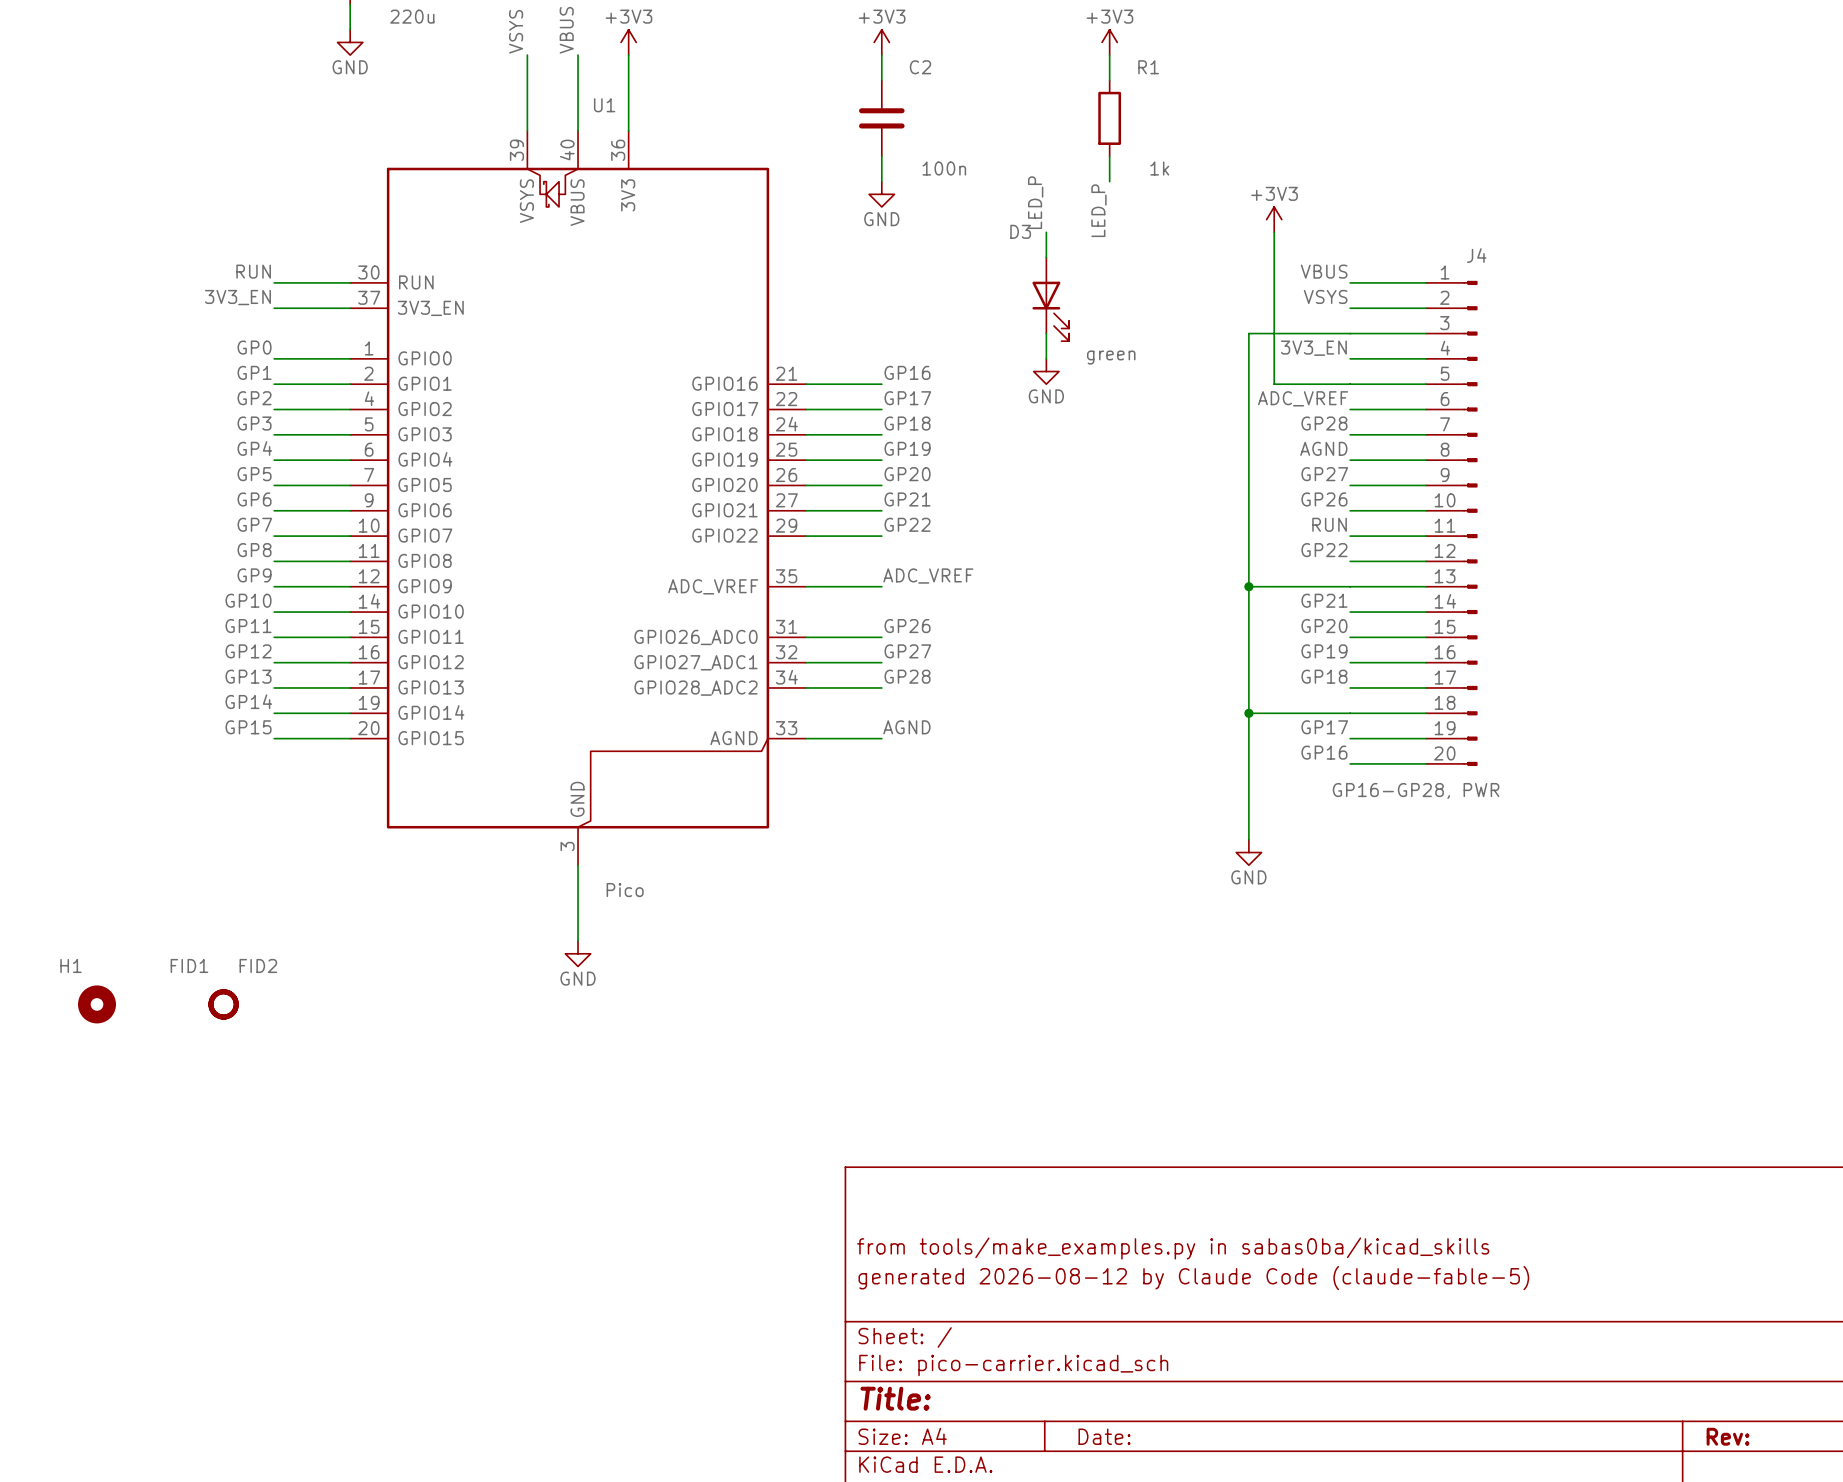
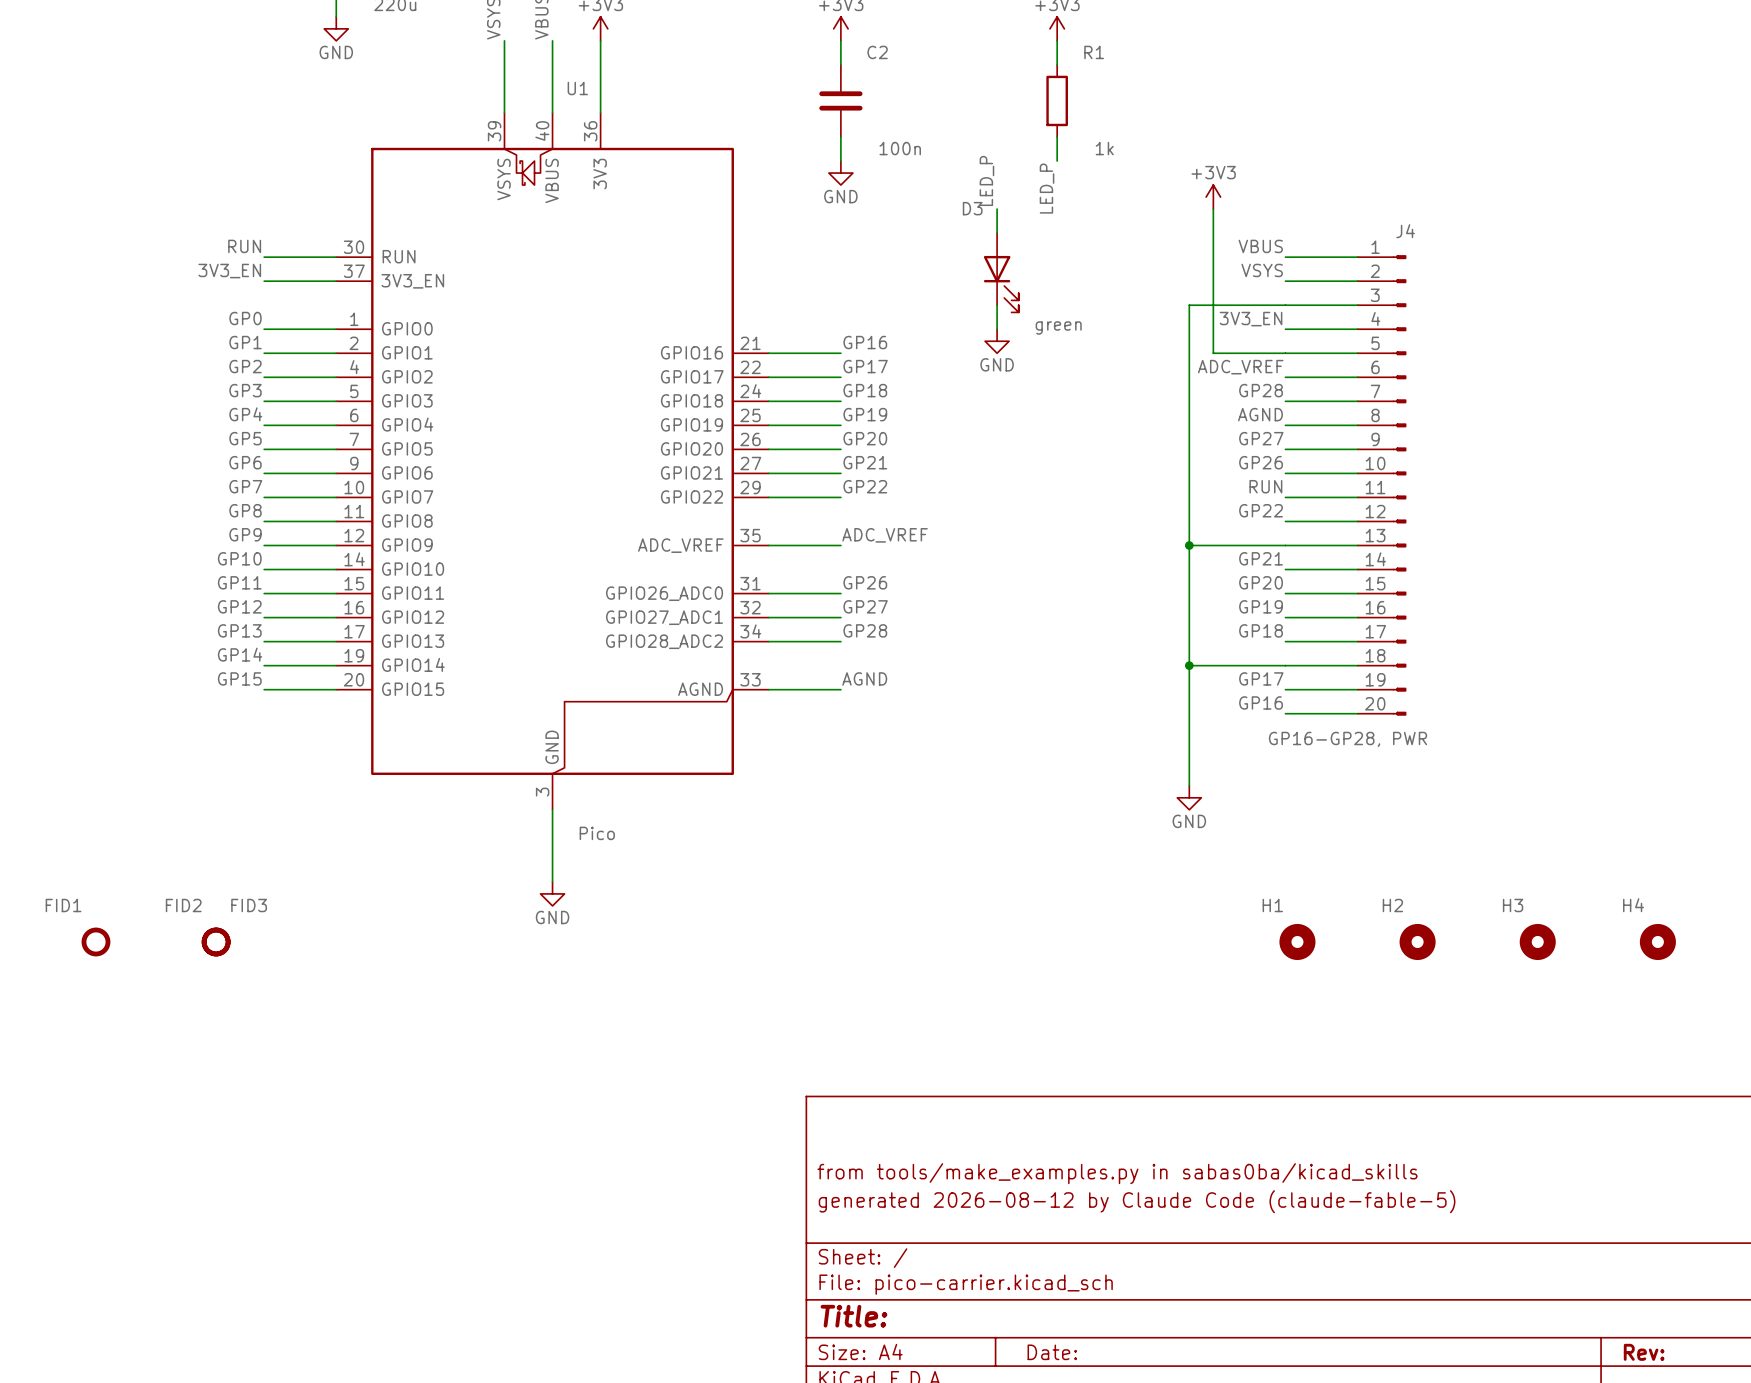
FID2 name position: FID2 (258, 965) -> FID2 (183, 905)
H1 position: (97, 1004) -> (1297, 941)
FID1 position: (223, 1004) -> (95, 941)
FID3: none -> (216, 941)
H2: none -> (1417, 941)
H3: none -> (1537, 941)
H4: none -> (1657, 941)

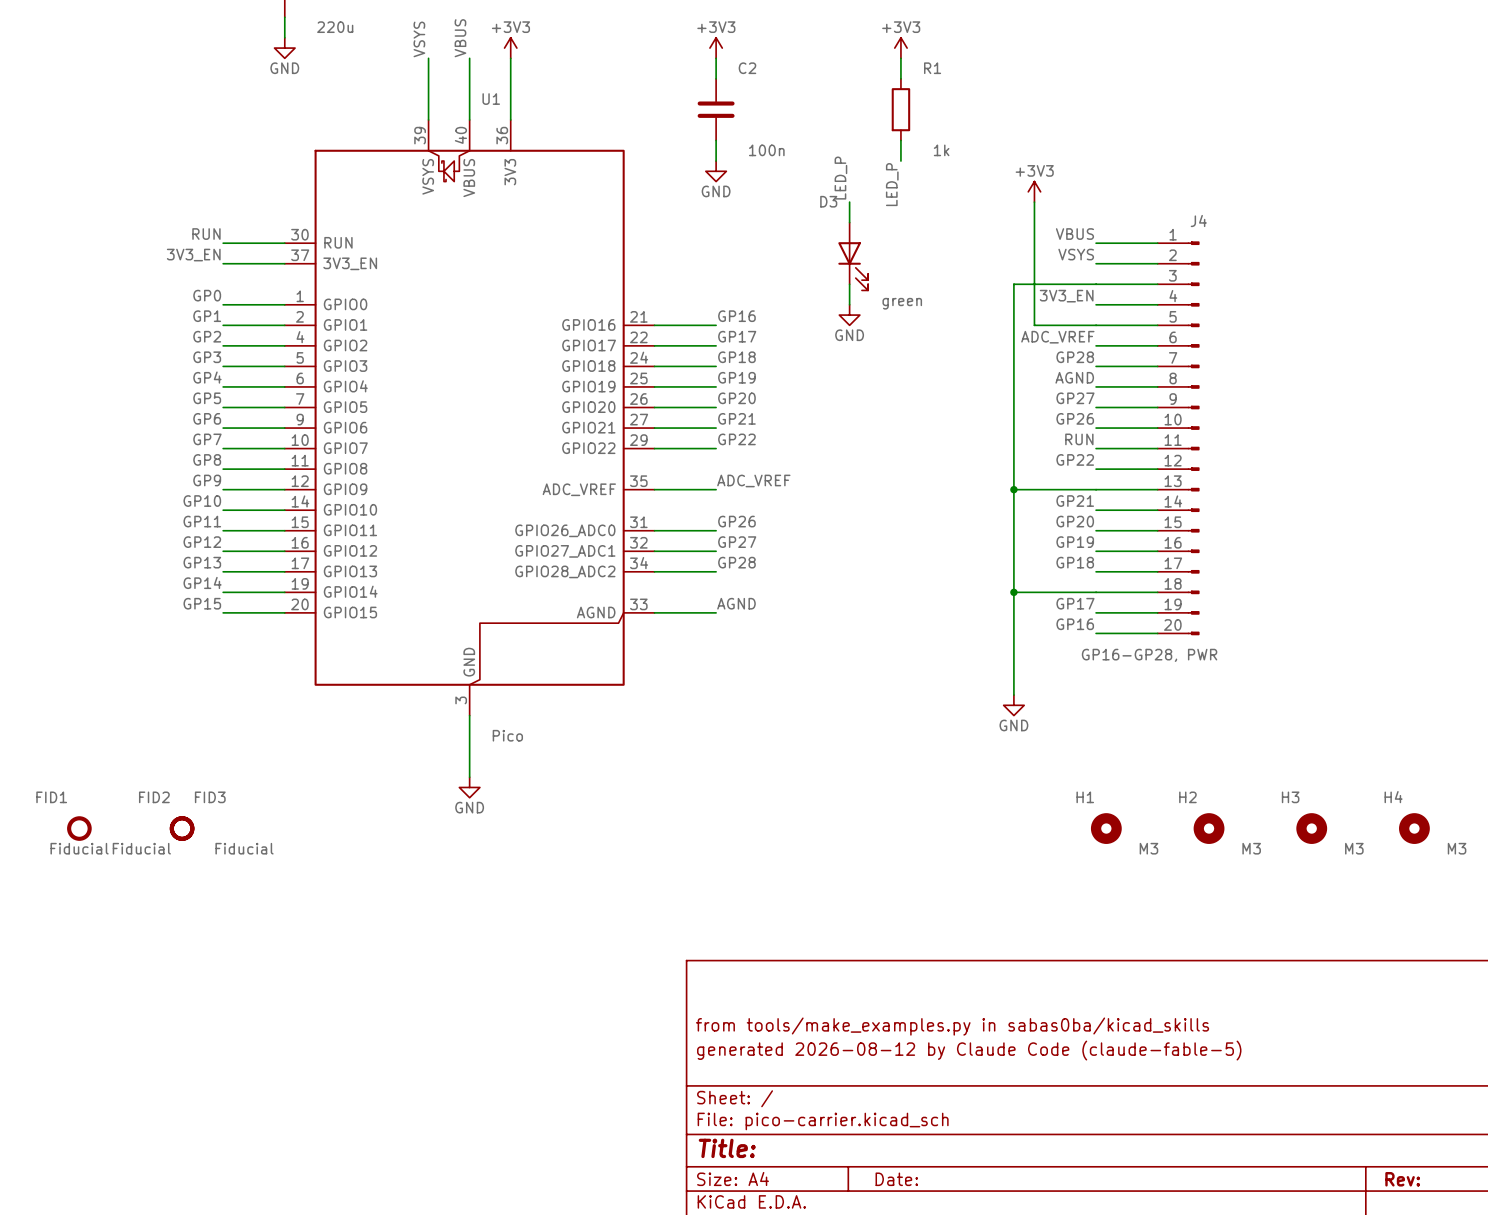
FID3 value: none -> Fiducial (79, 848)
FID1 value: none -> Fiducial (141, 848)
FID2 value: none -> Fiducial (244, 848)
H1 value: none -> M3 (1148, 848)
H2 value: none -> M3 (1251, 848)
H3 value: none -> M3 (1354, 848)
H4 value: none -> M3 (1457, 848)

